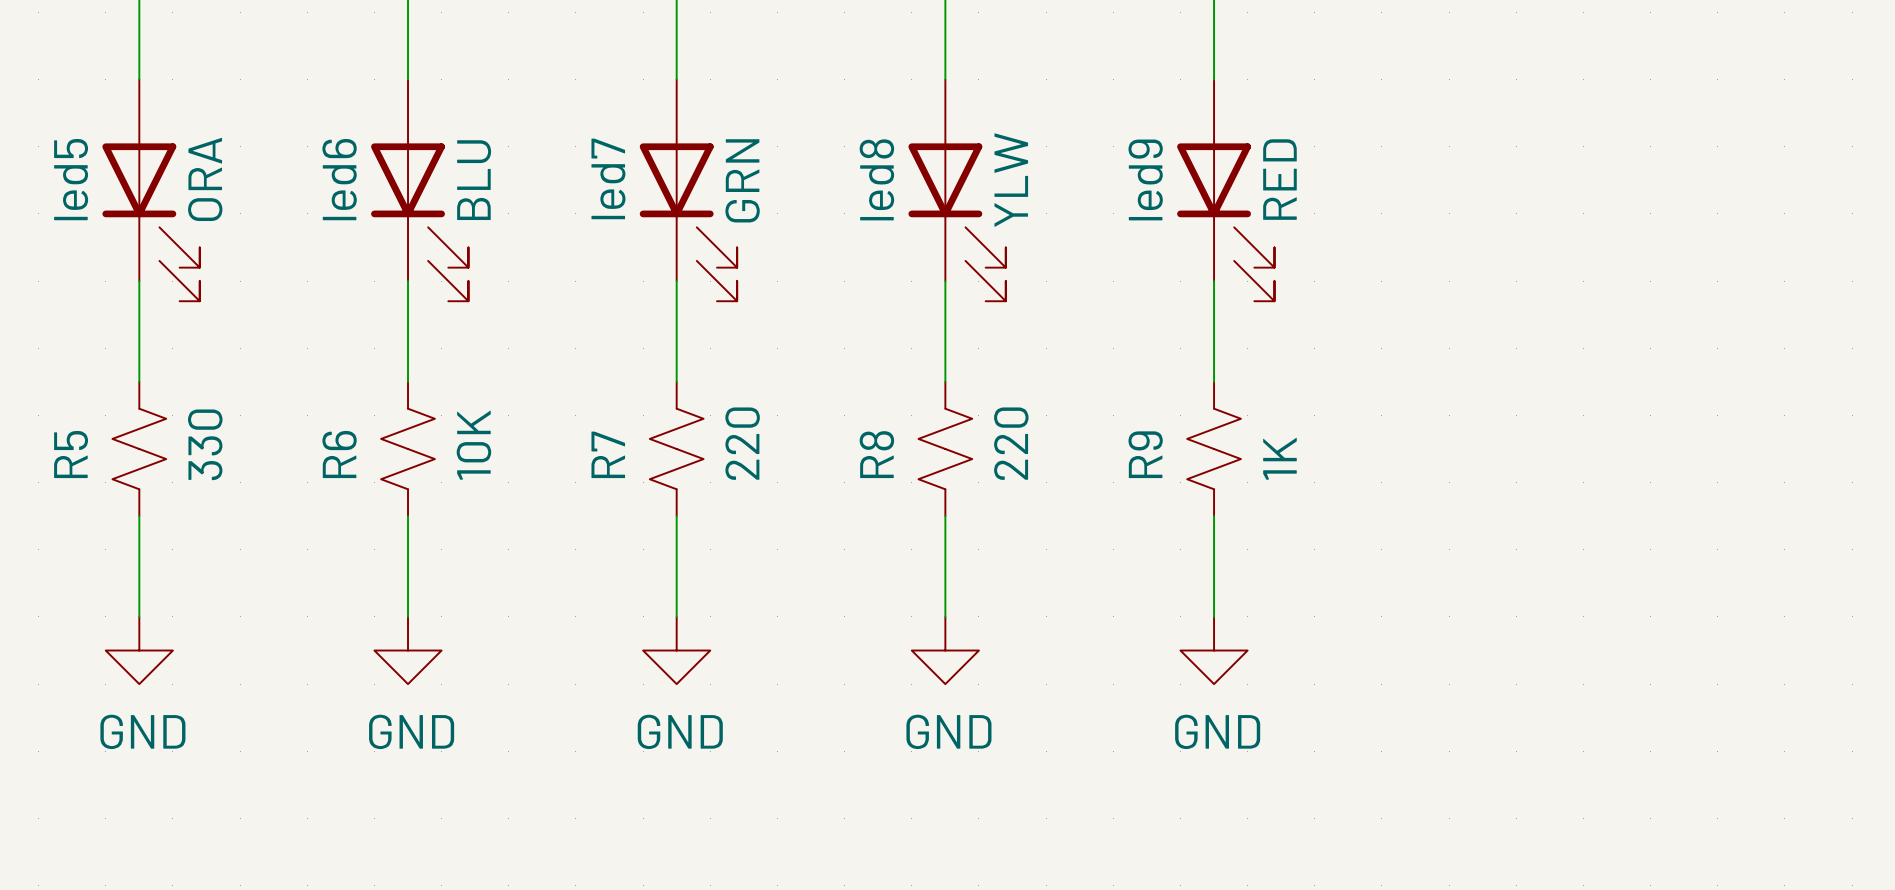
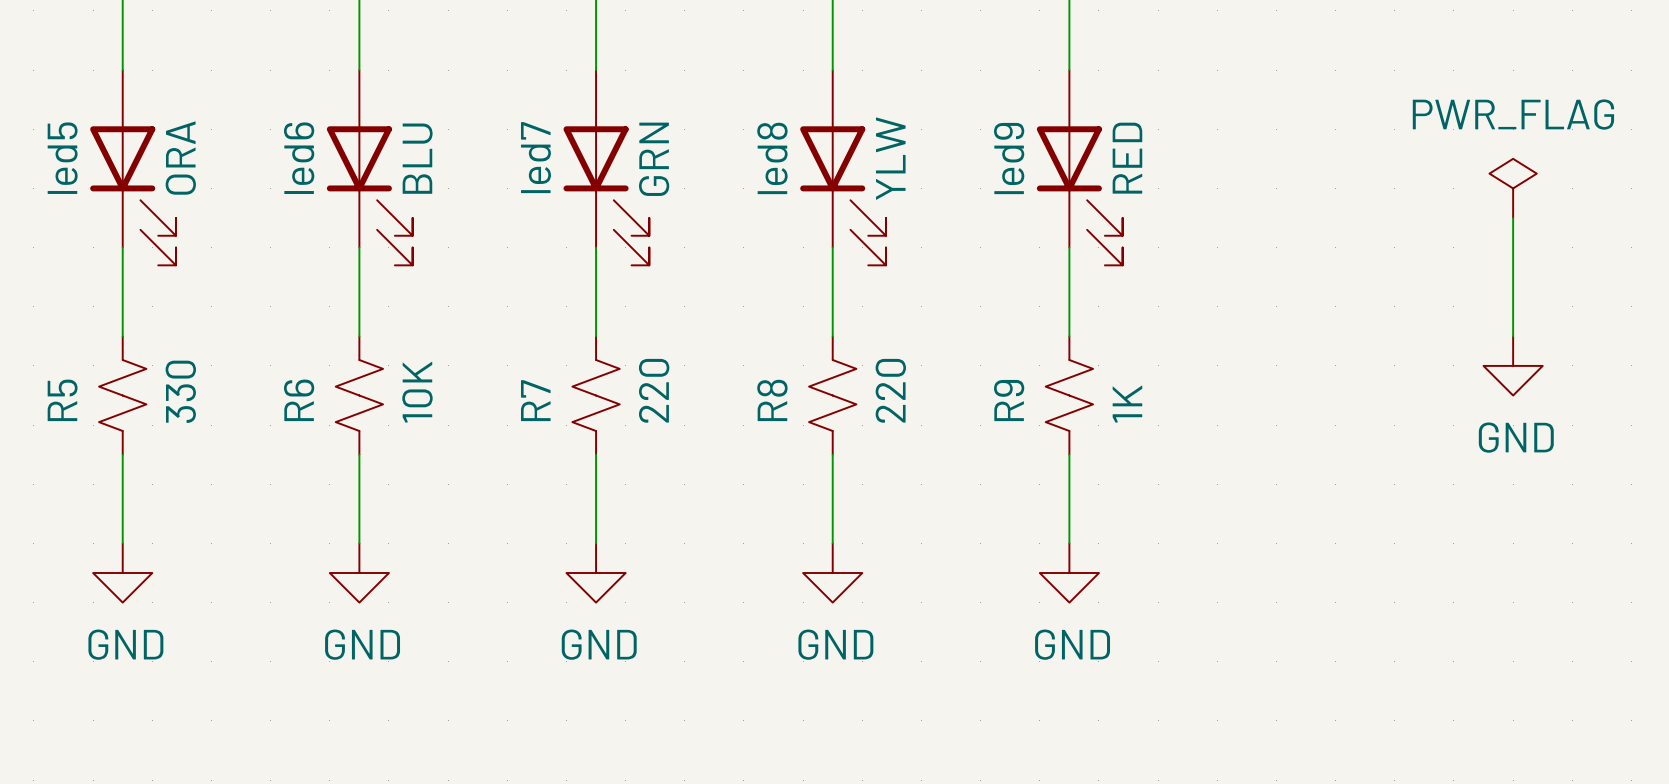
power symbol: none -> PWR_FLAG (1513, 188)
wire: none -> (1513, 218) (1513, 336)
power symbol: none -> GND (1513, 365)

